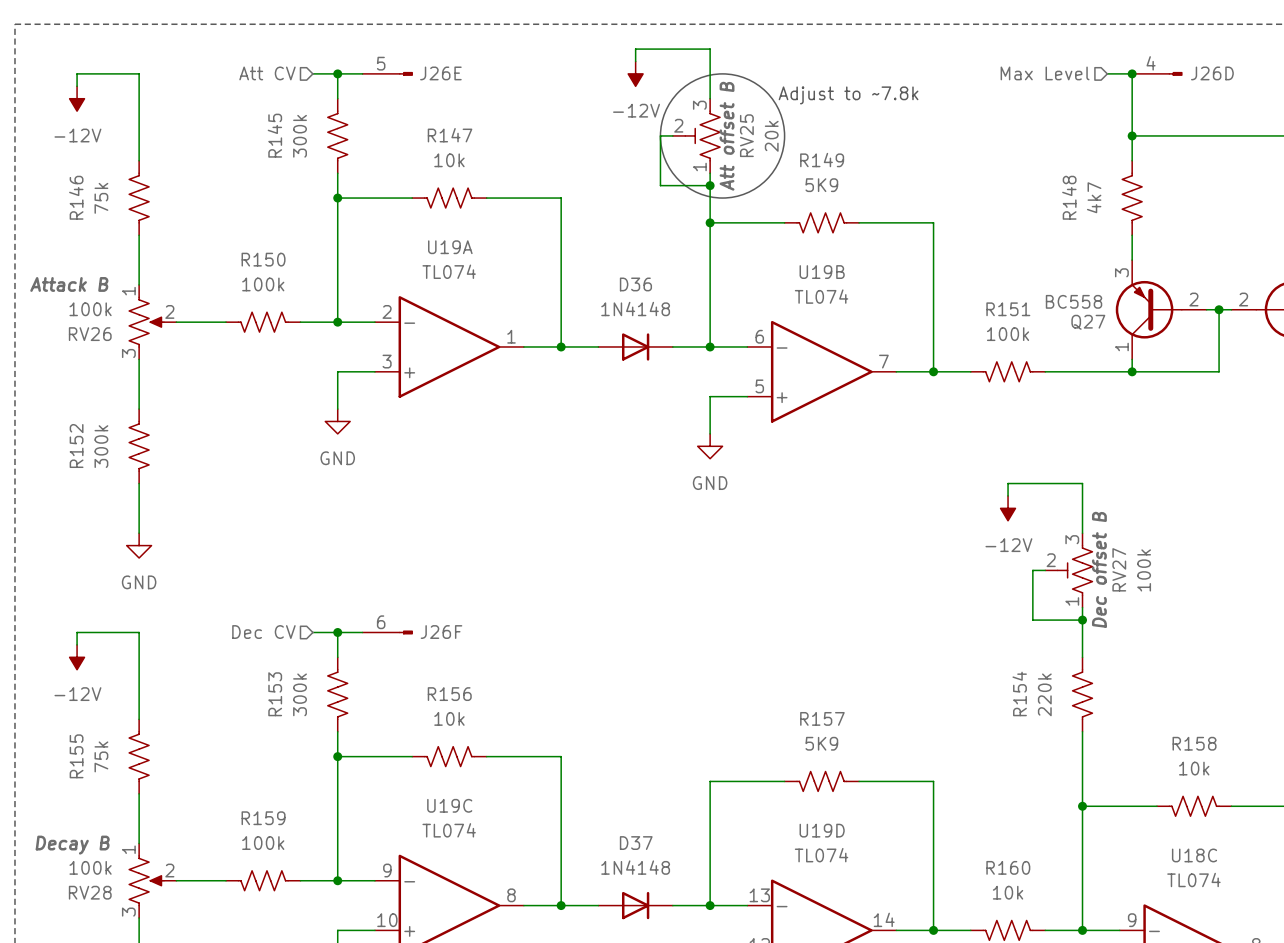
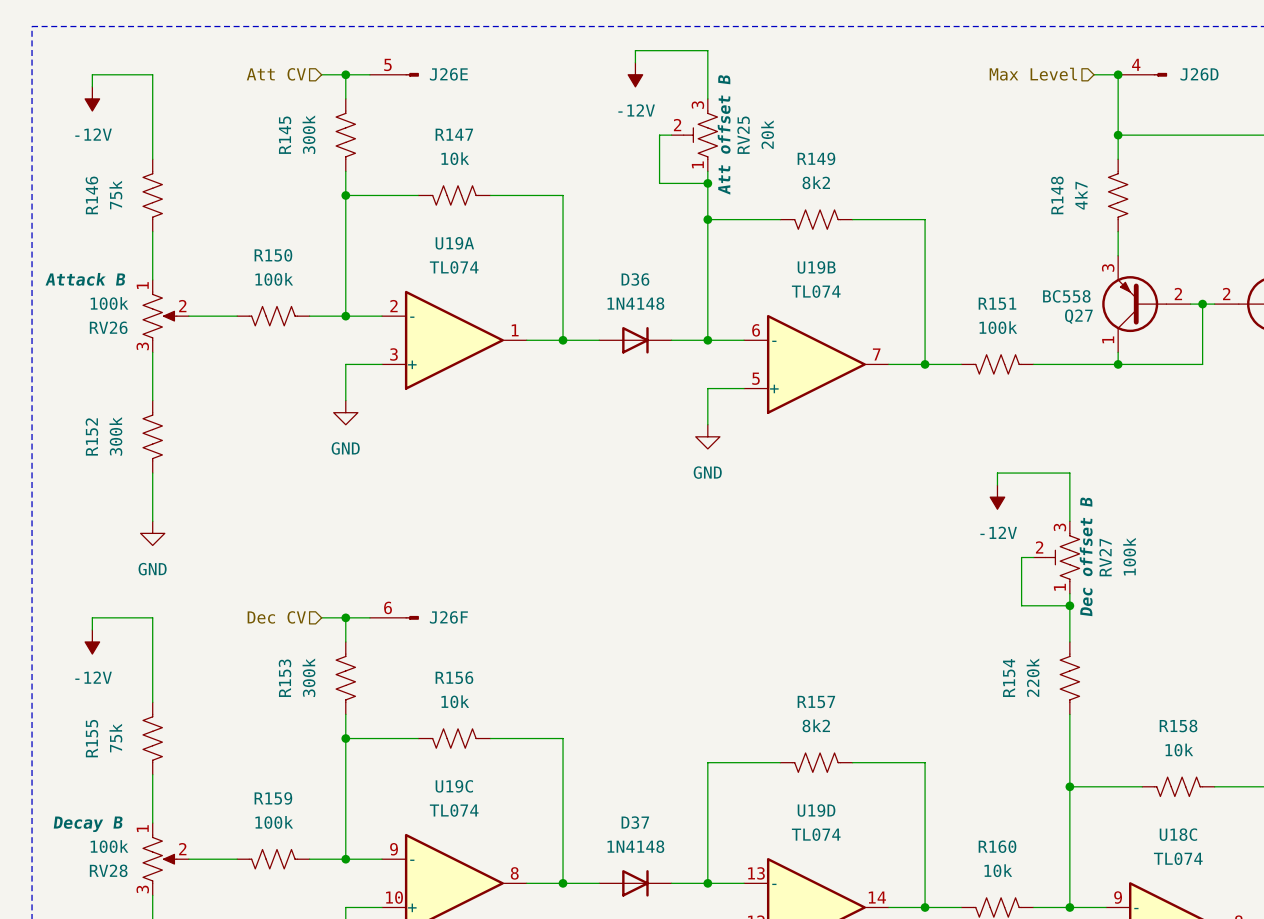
drawing: [660, 73, 785, 199] -> none
text: Adjust to ~7.8k (848, 95) -> none
R149 value: 5K9 (821, 185) -> 8k2 (816, 182)
R157 value: 5K9 (821, 743) -> 8k2 (816, 725)

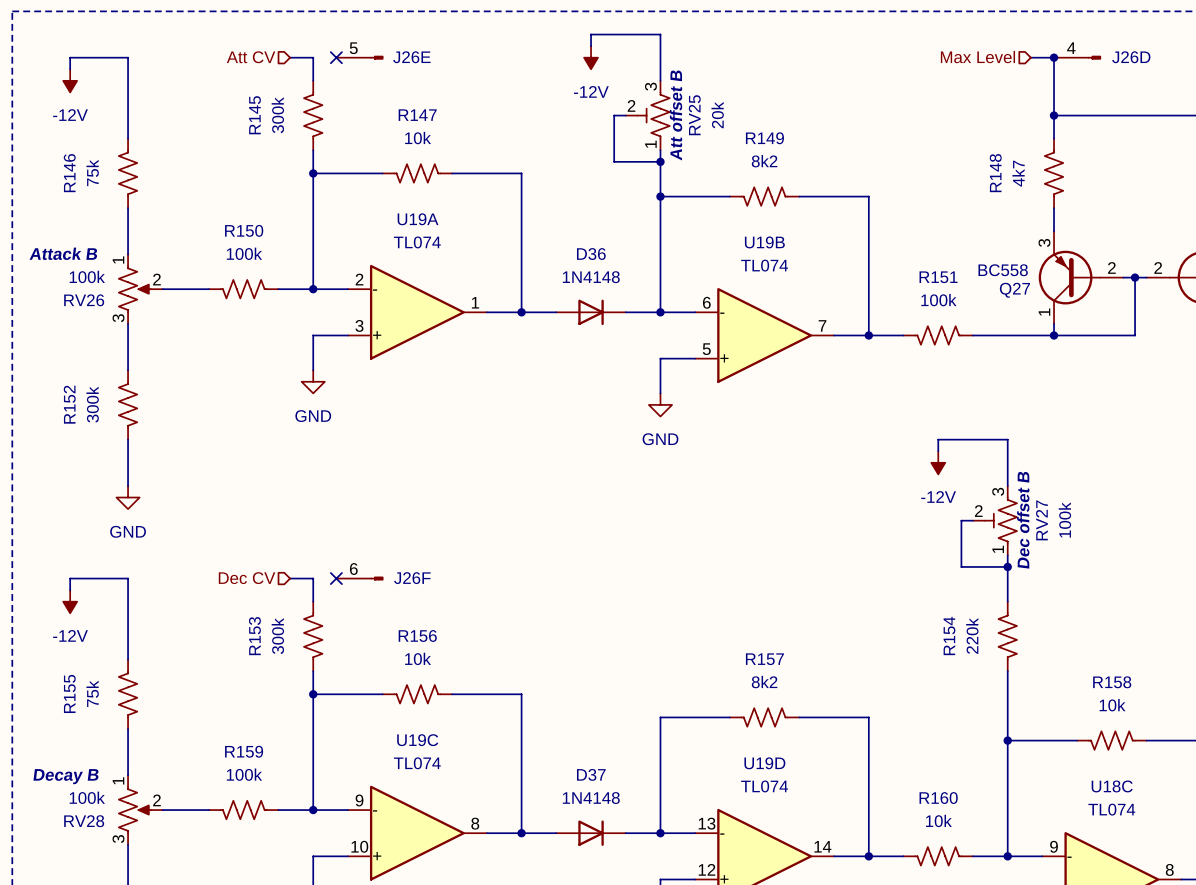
wire: (345, 74) (369, 74) -> none
junction: (345, 74) -> none
no-connect mark: none -> (336, 57)
wire: (345, 617) (369, 617) -> none
junction: (345, 617) -> none
no-connect mark: none -> (336, 578)

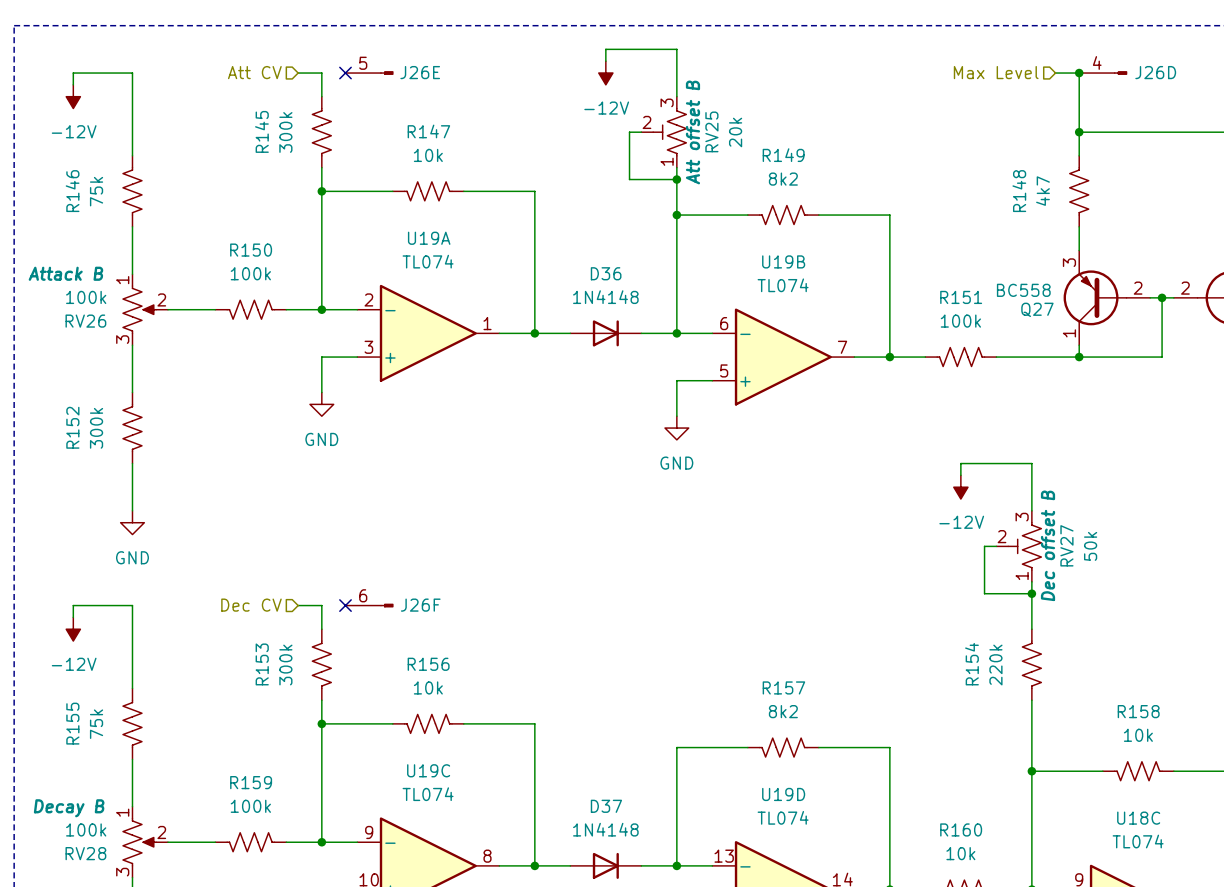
RV27 value: 100k (1064, 520) -> 50k (1090, 546)

